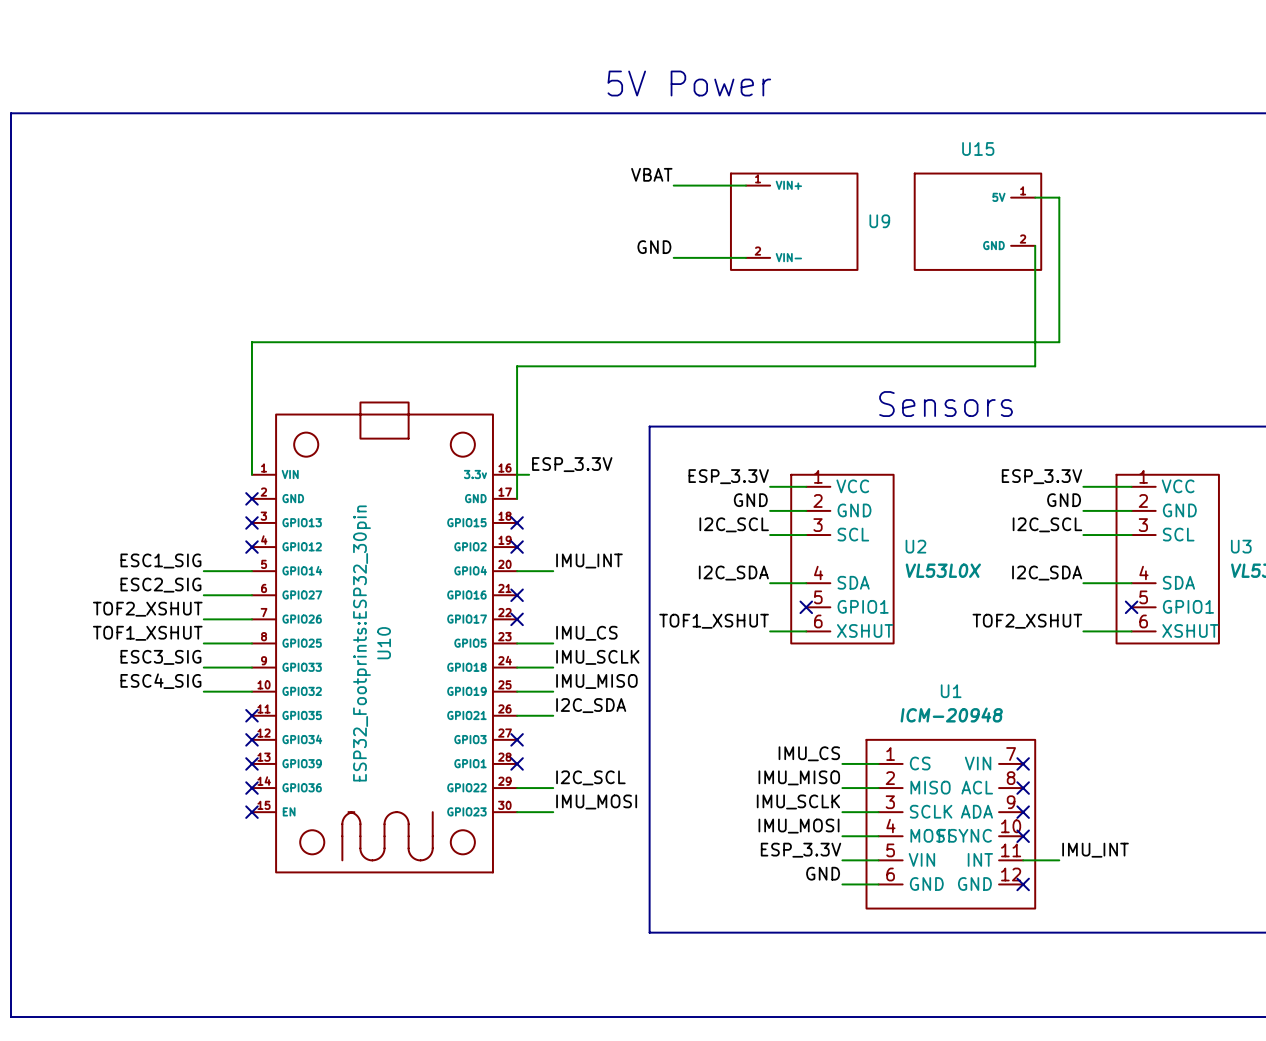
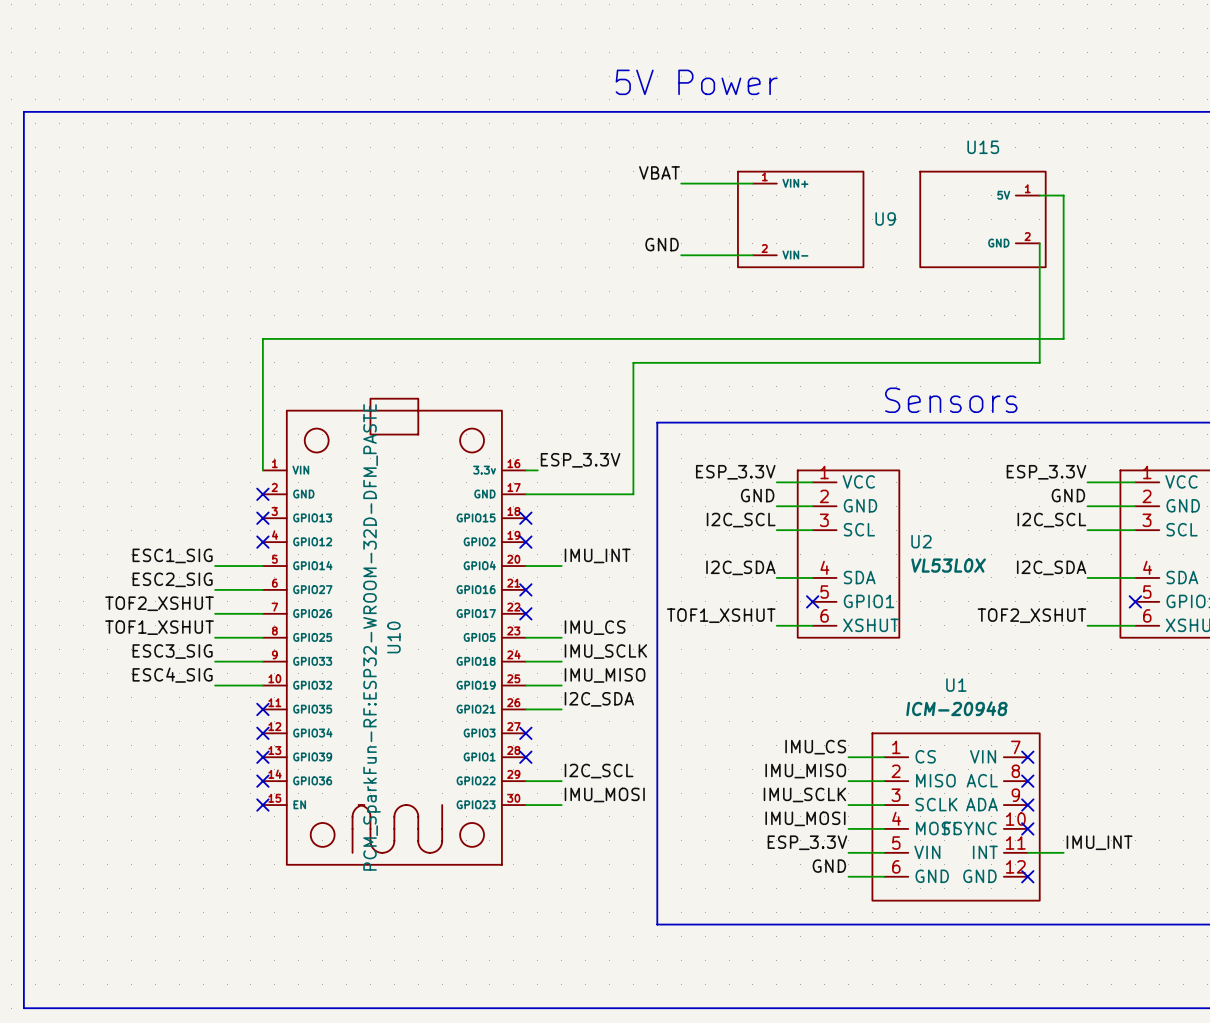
wire: (625, 366) (517, 366) (517, 498) -> (633, 362) (633, 494) (525, 494)
U10 text: ESP32_Footprints:ESP32_30pin (361, 643) -> PCM_SparkFun-RF:ESP32-WROOM-32D-DFM_PASTE (372, 637)

